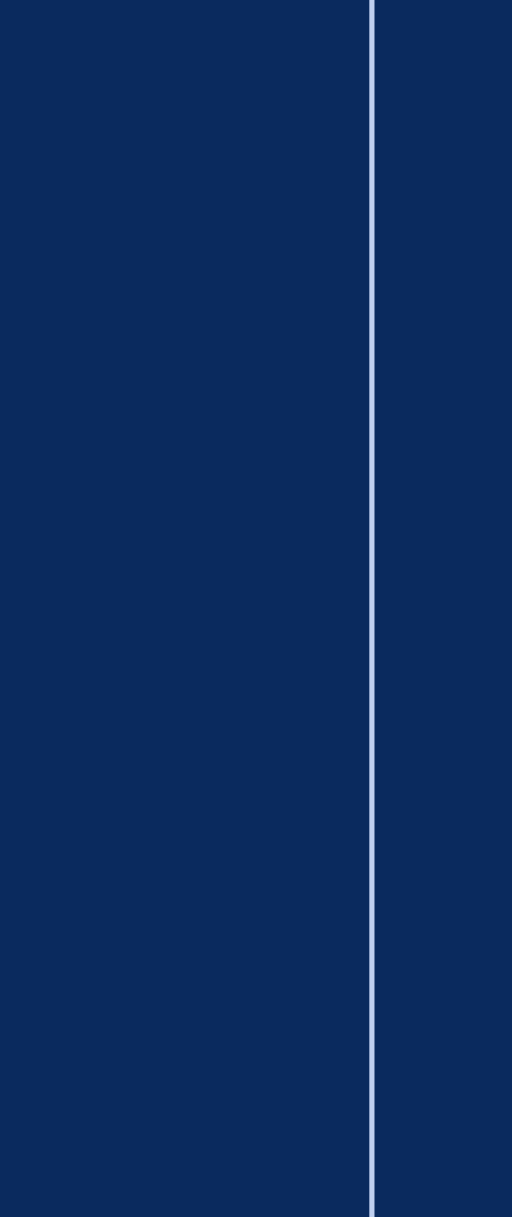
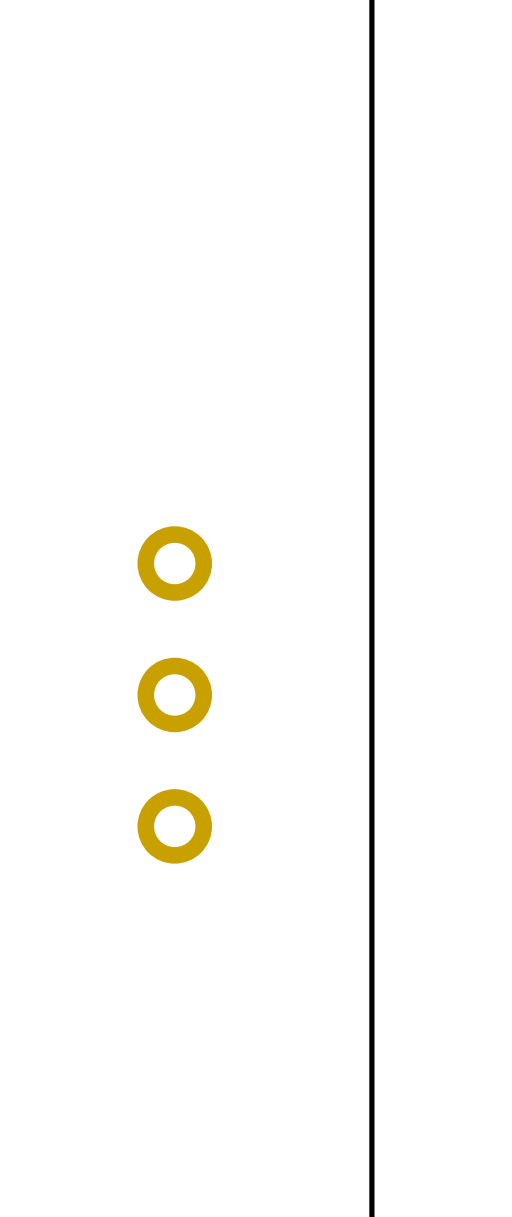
part: none -> (174, 694)

